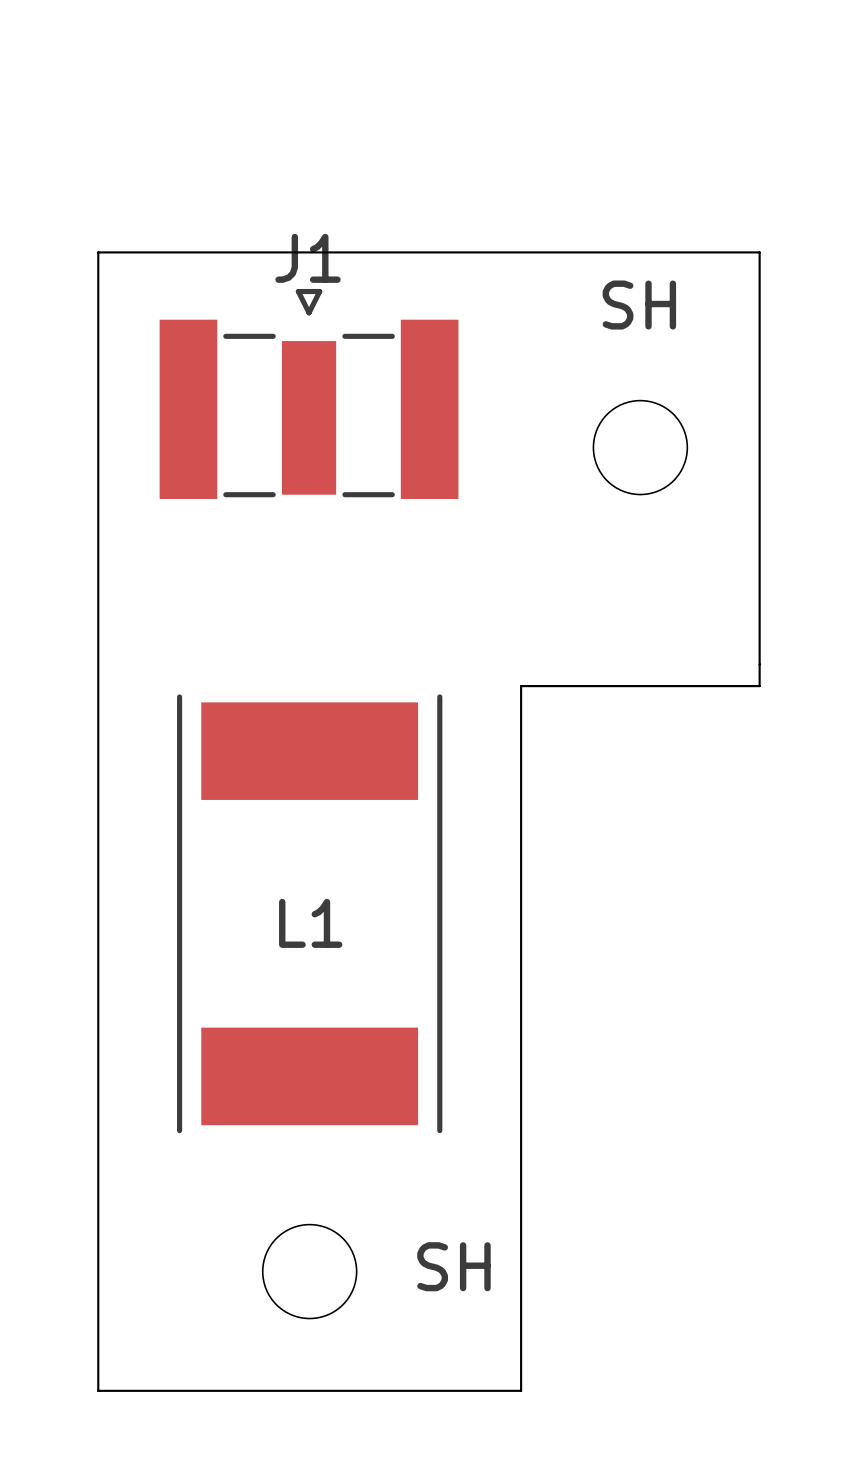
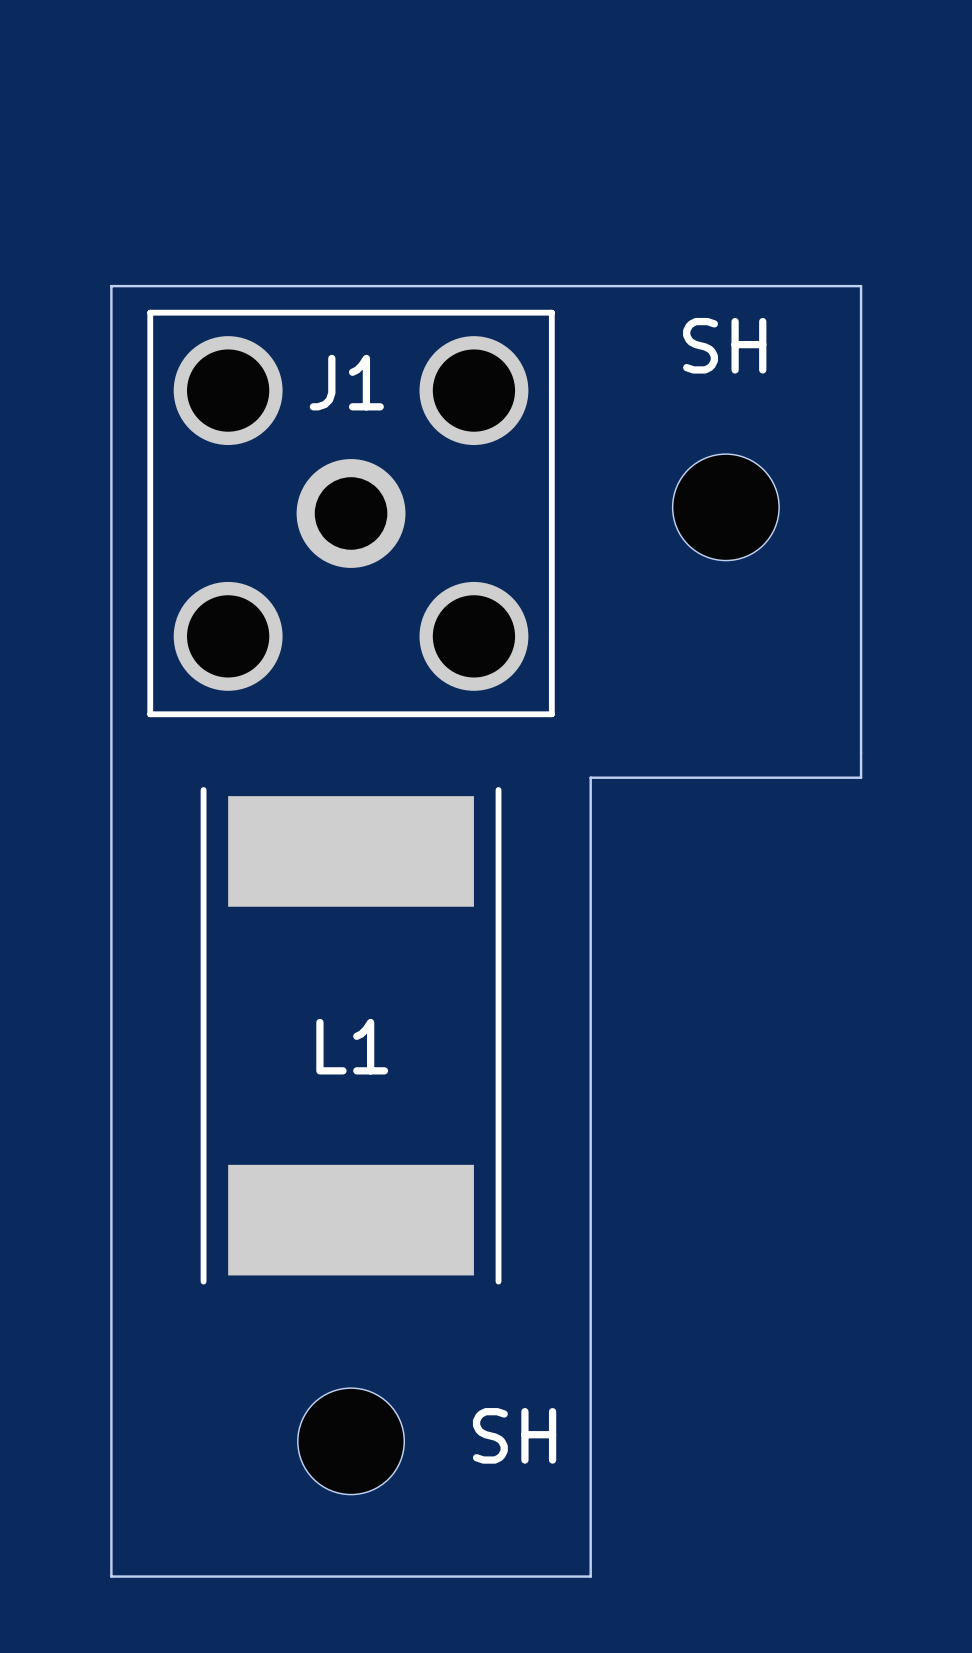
J1 footprint: [159, 288, 459, 499] -> [147, 309, 555, 718]

